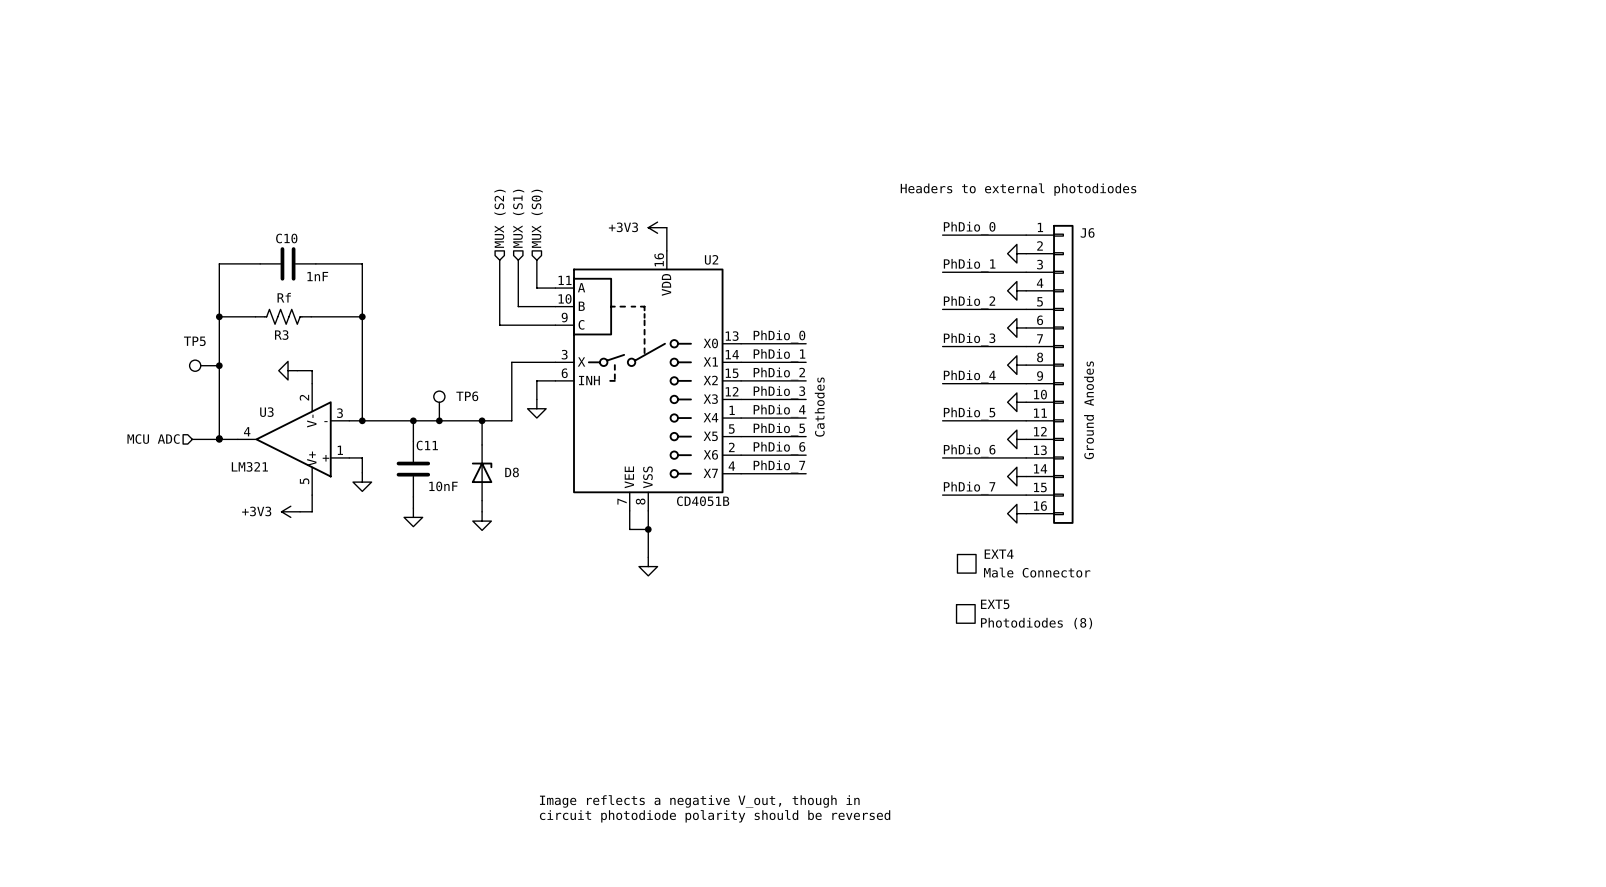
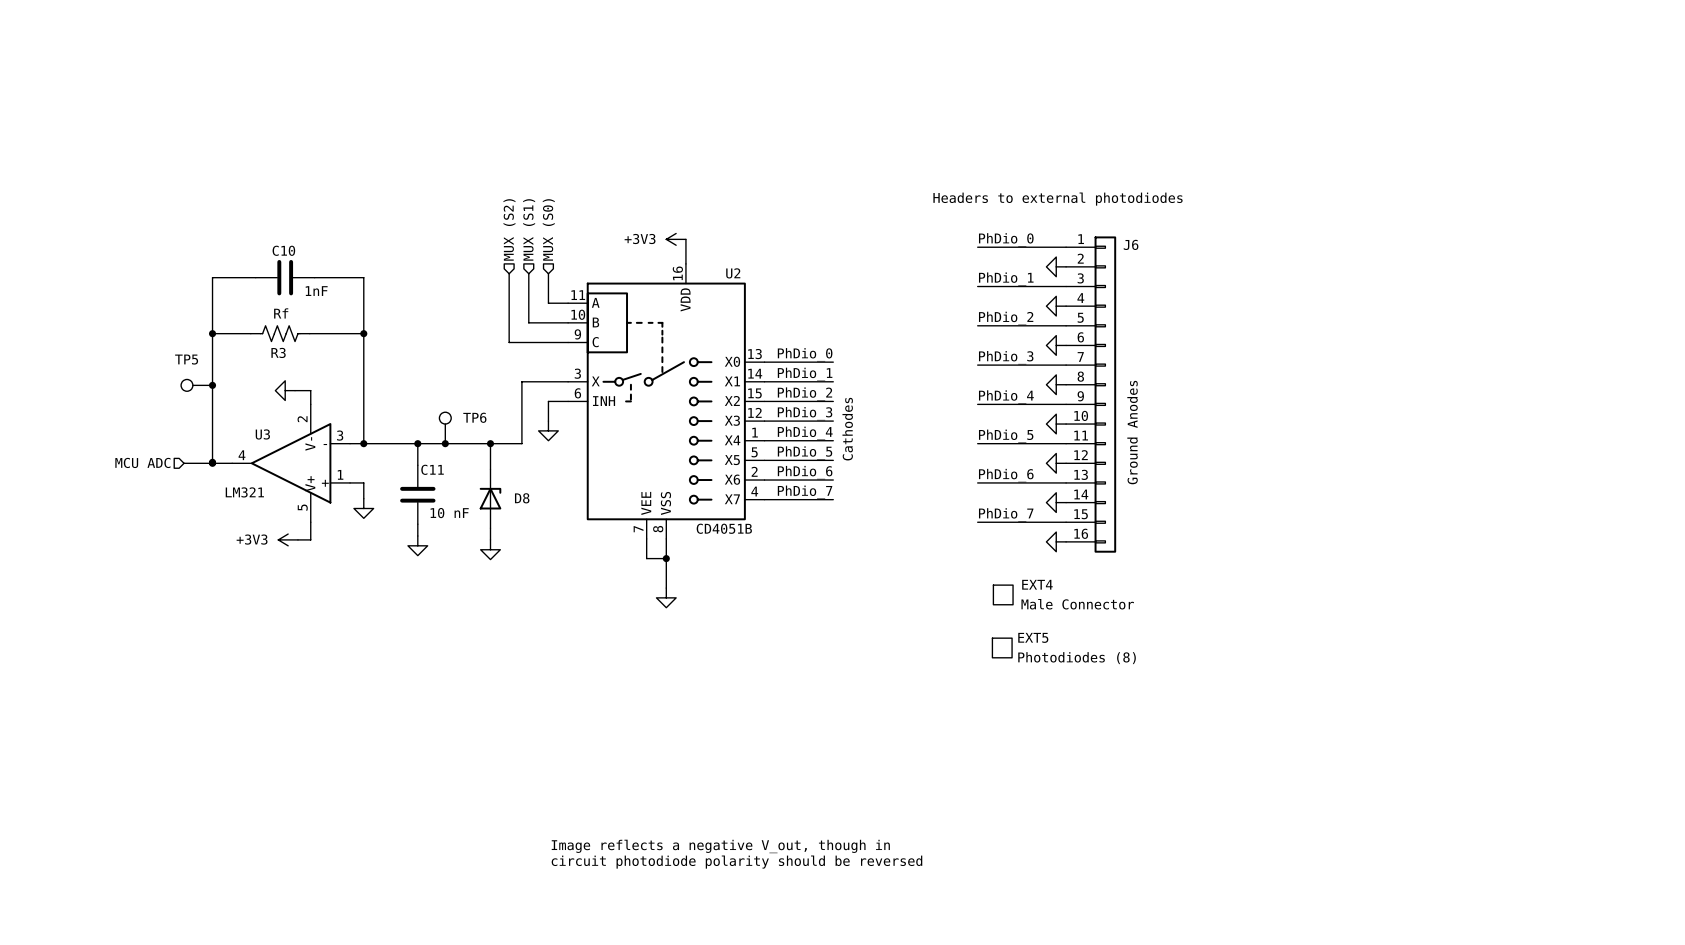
C11 value: 10nF (443, 486) -> 10 nF (449, 513)

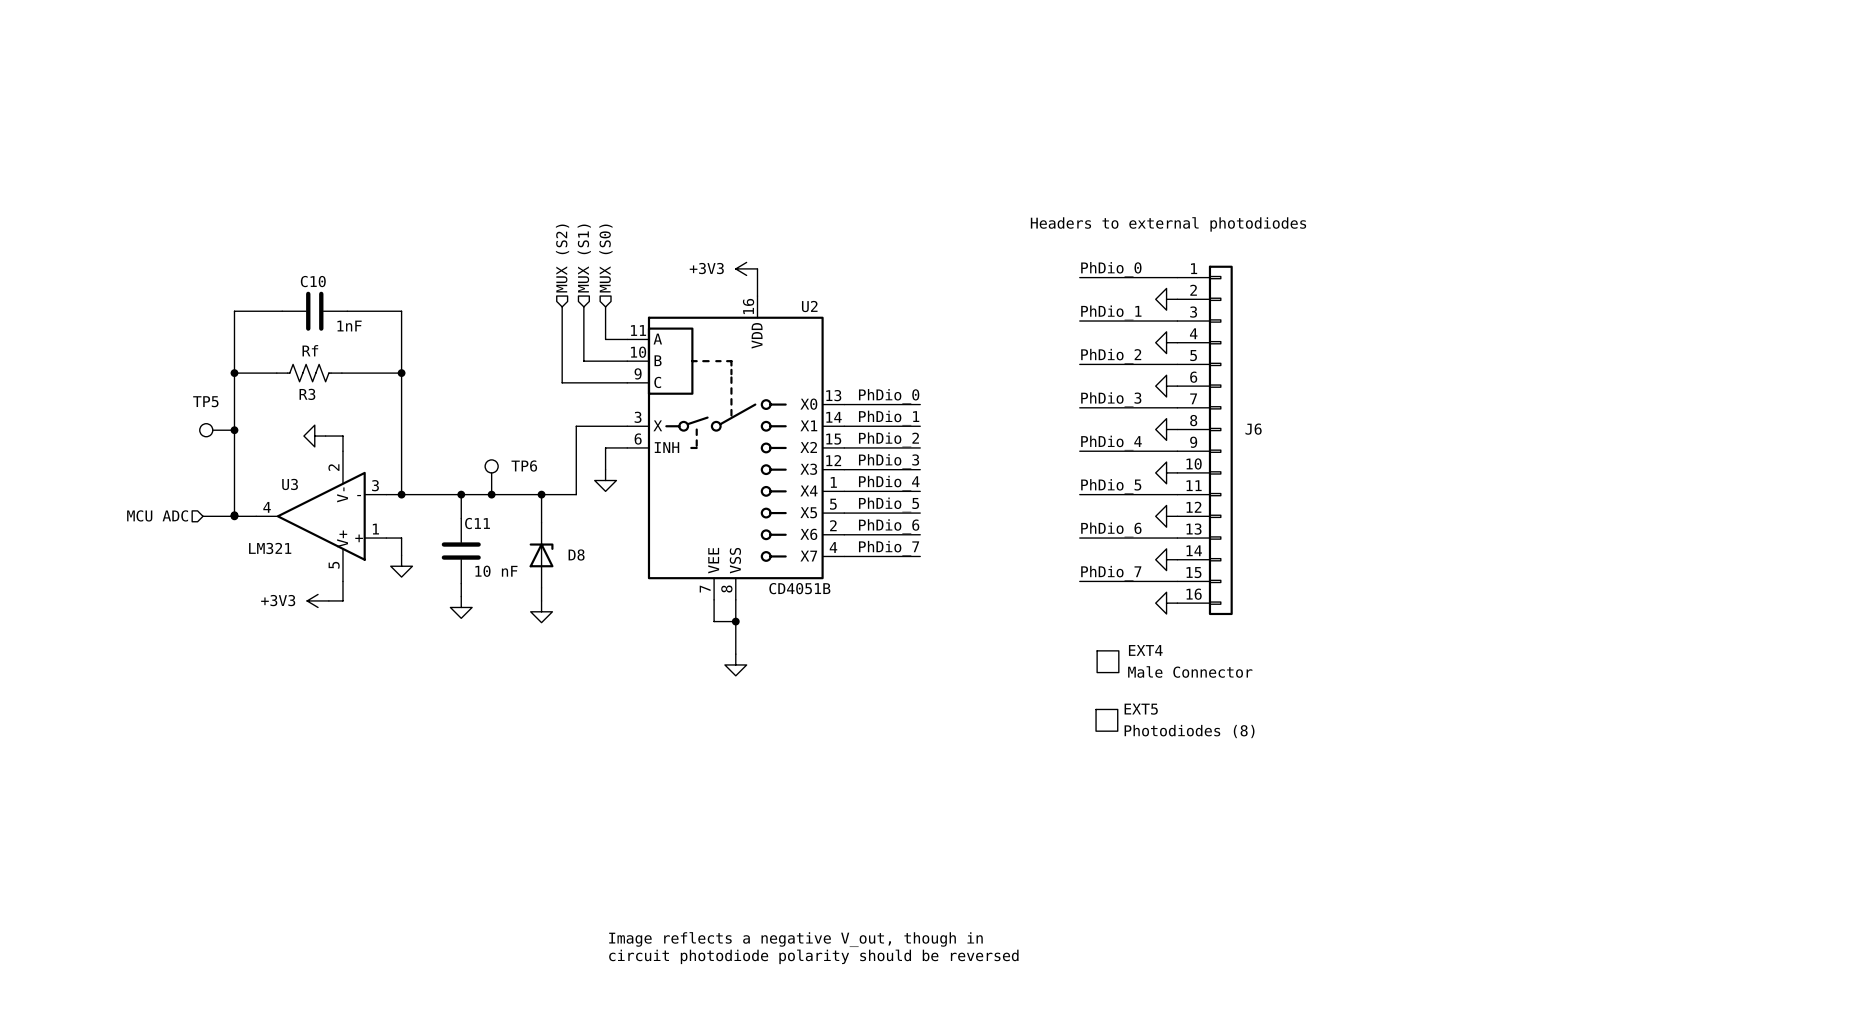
J6 name position: J6 (1131, 244) -> J6 (1253, 429)
text: Cathodes (847, 429) -> none
text: Ground Anodes (1132, 432) -> none

